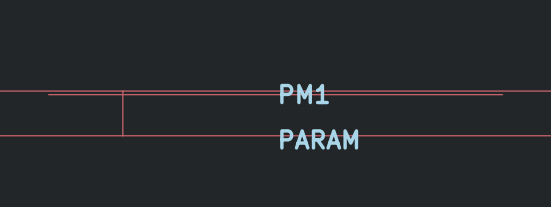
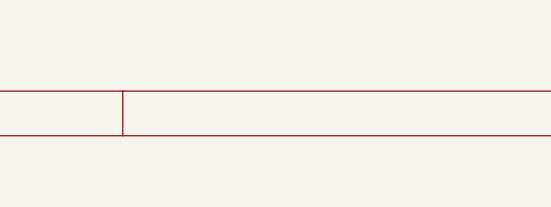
PM1: PARAM (275, 94) -> none

